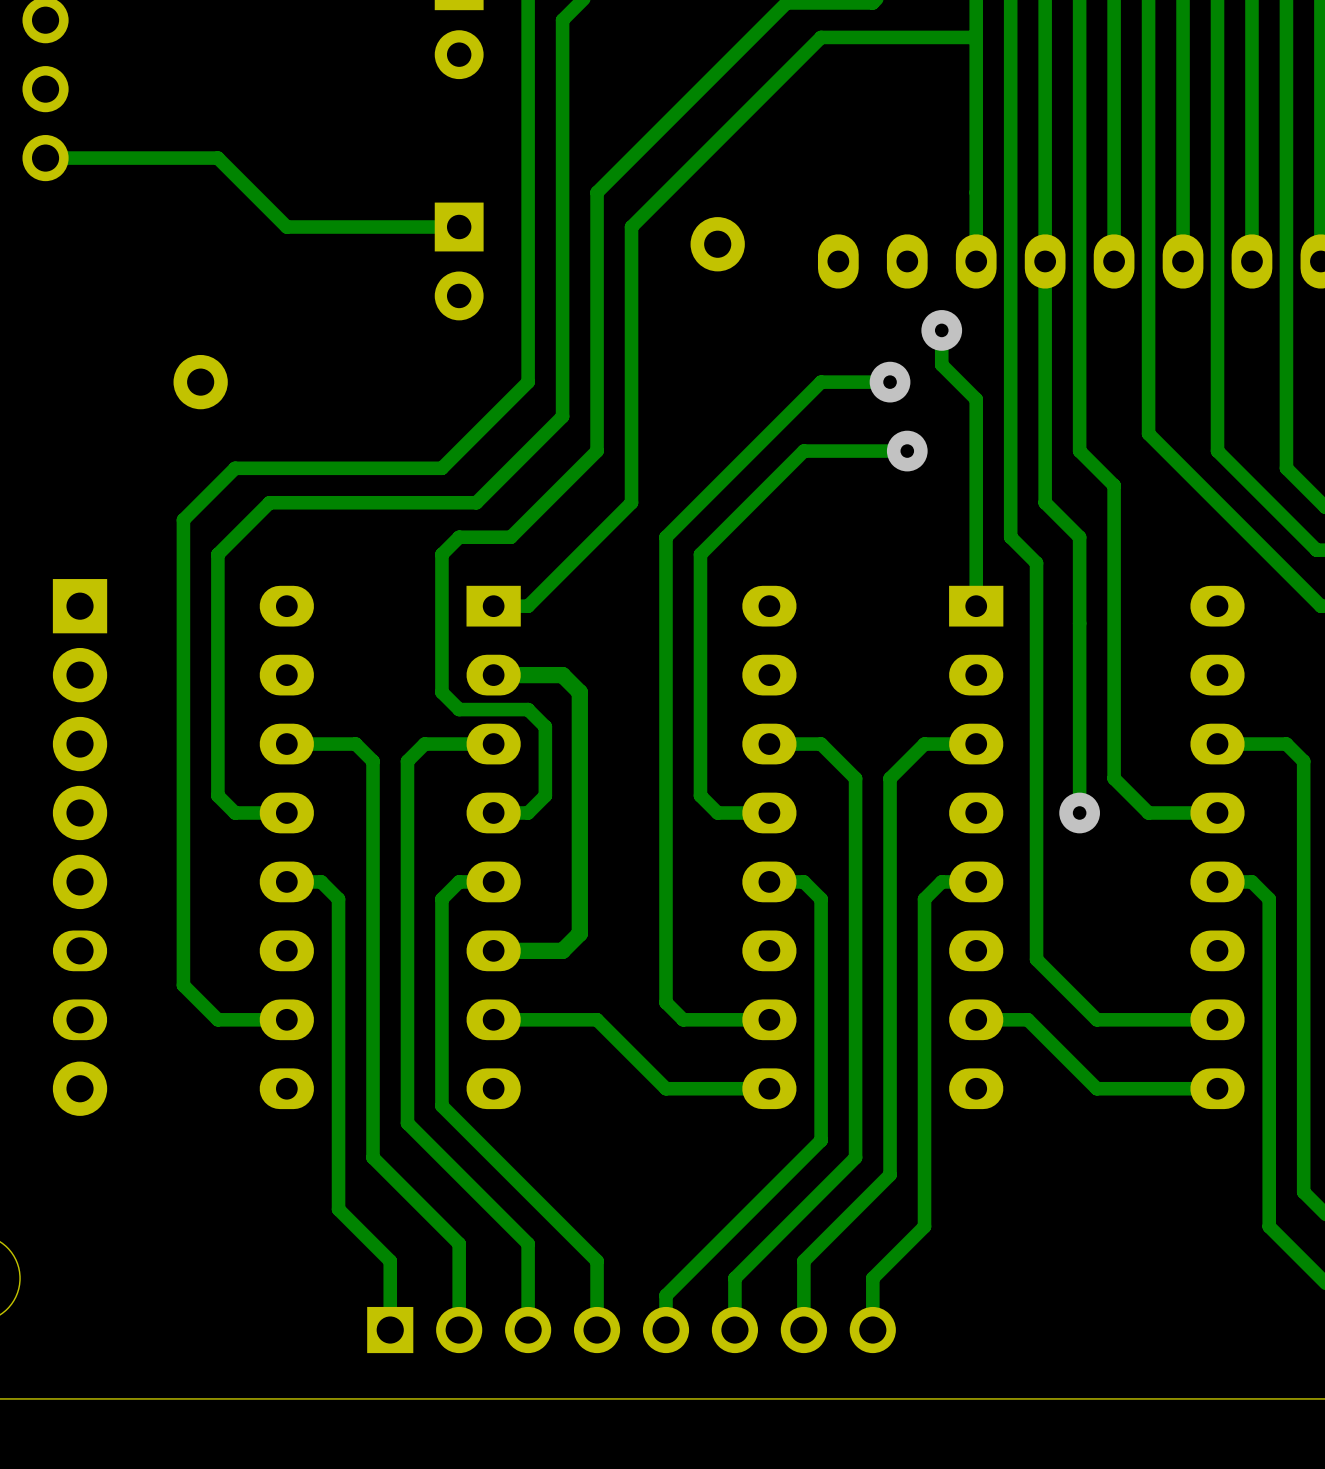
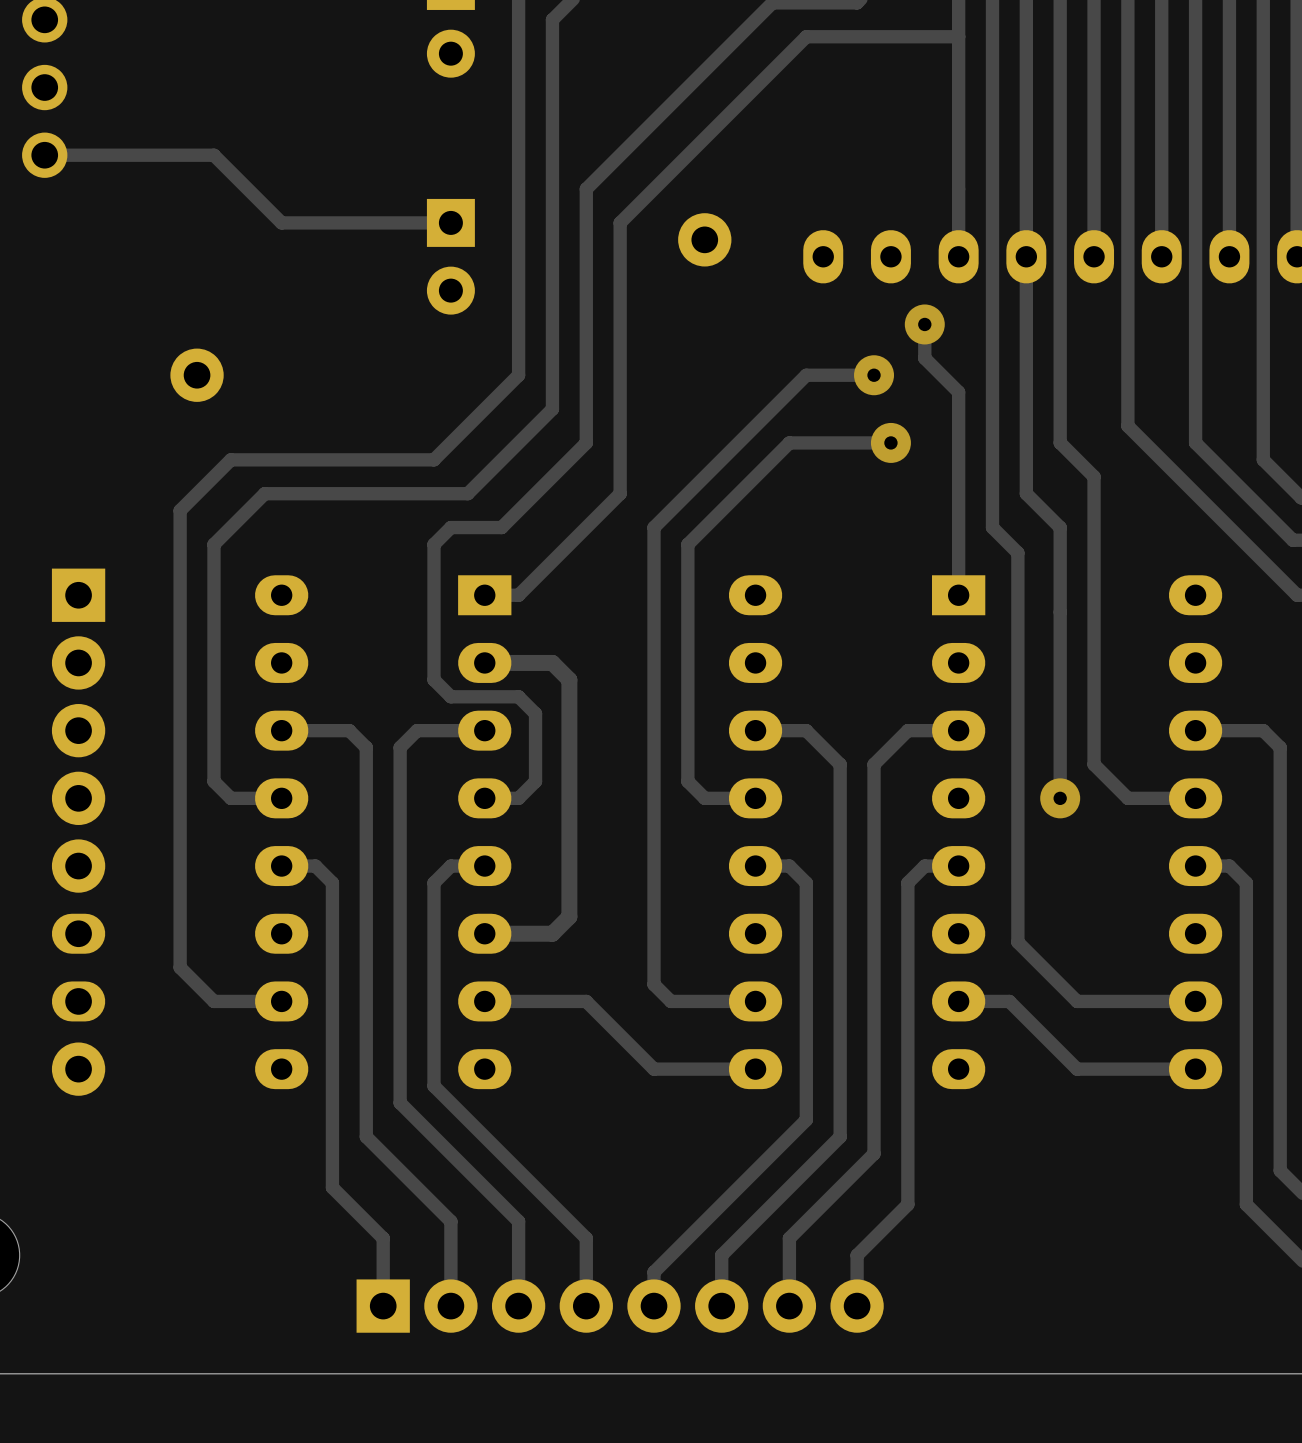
part footprint: [367, 1306, 896, 1354] -> [356, 1279, 884, 1333]

